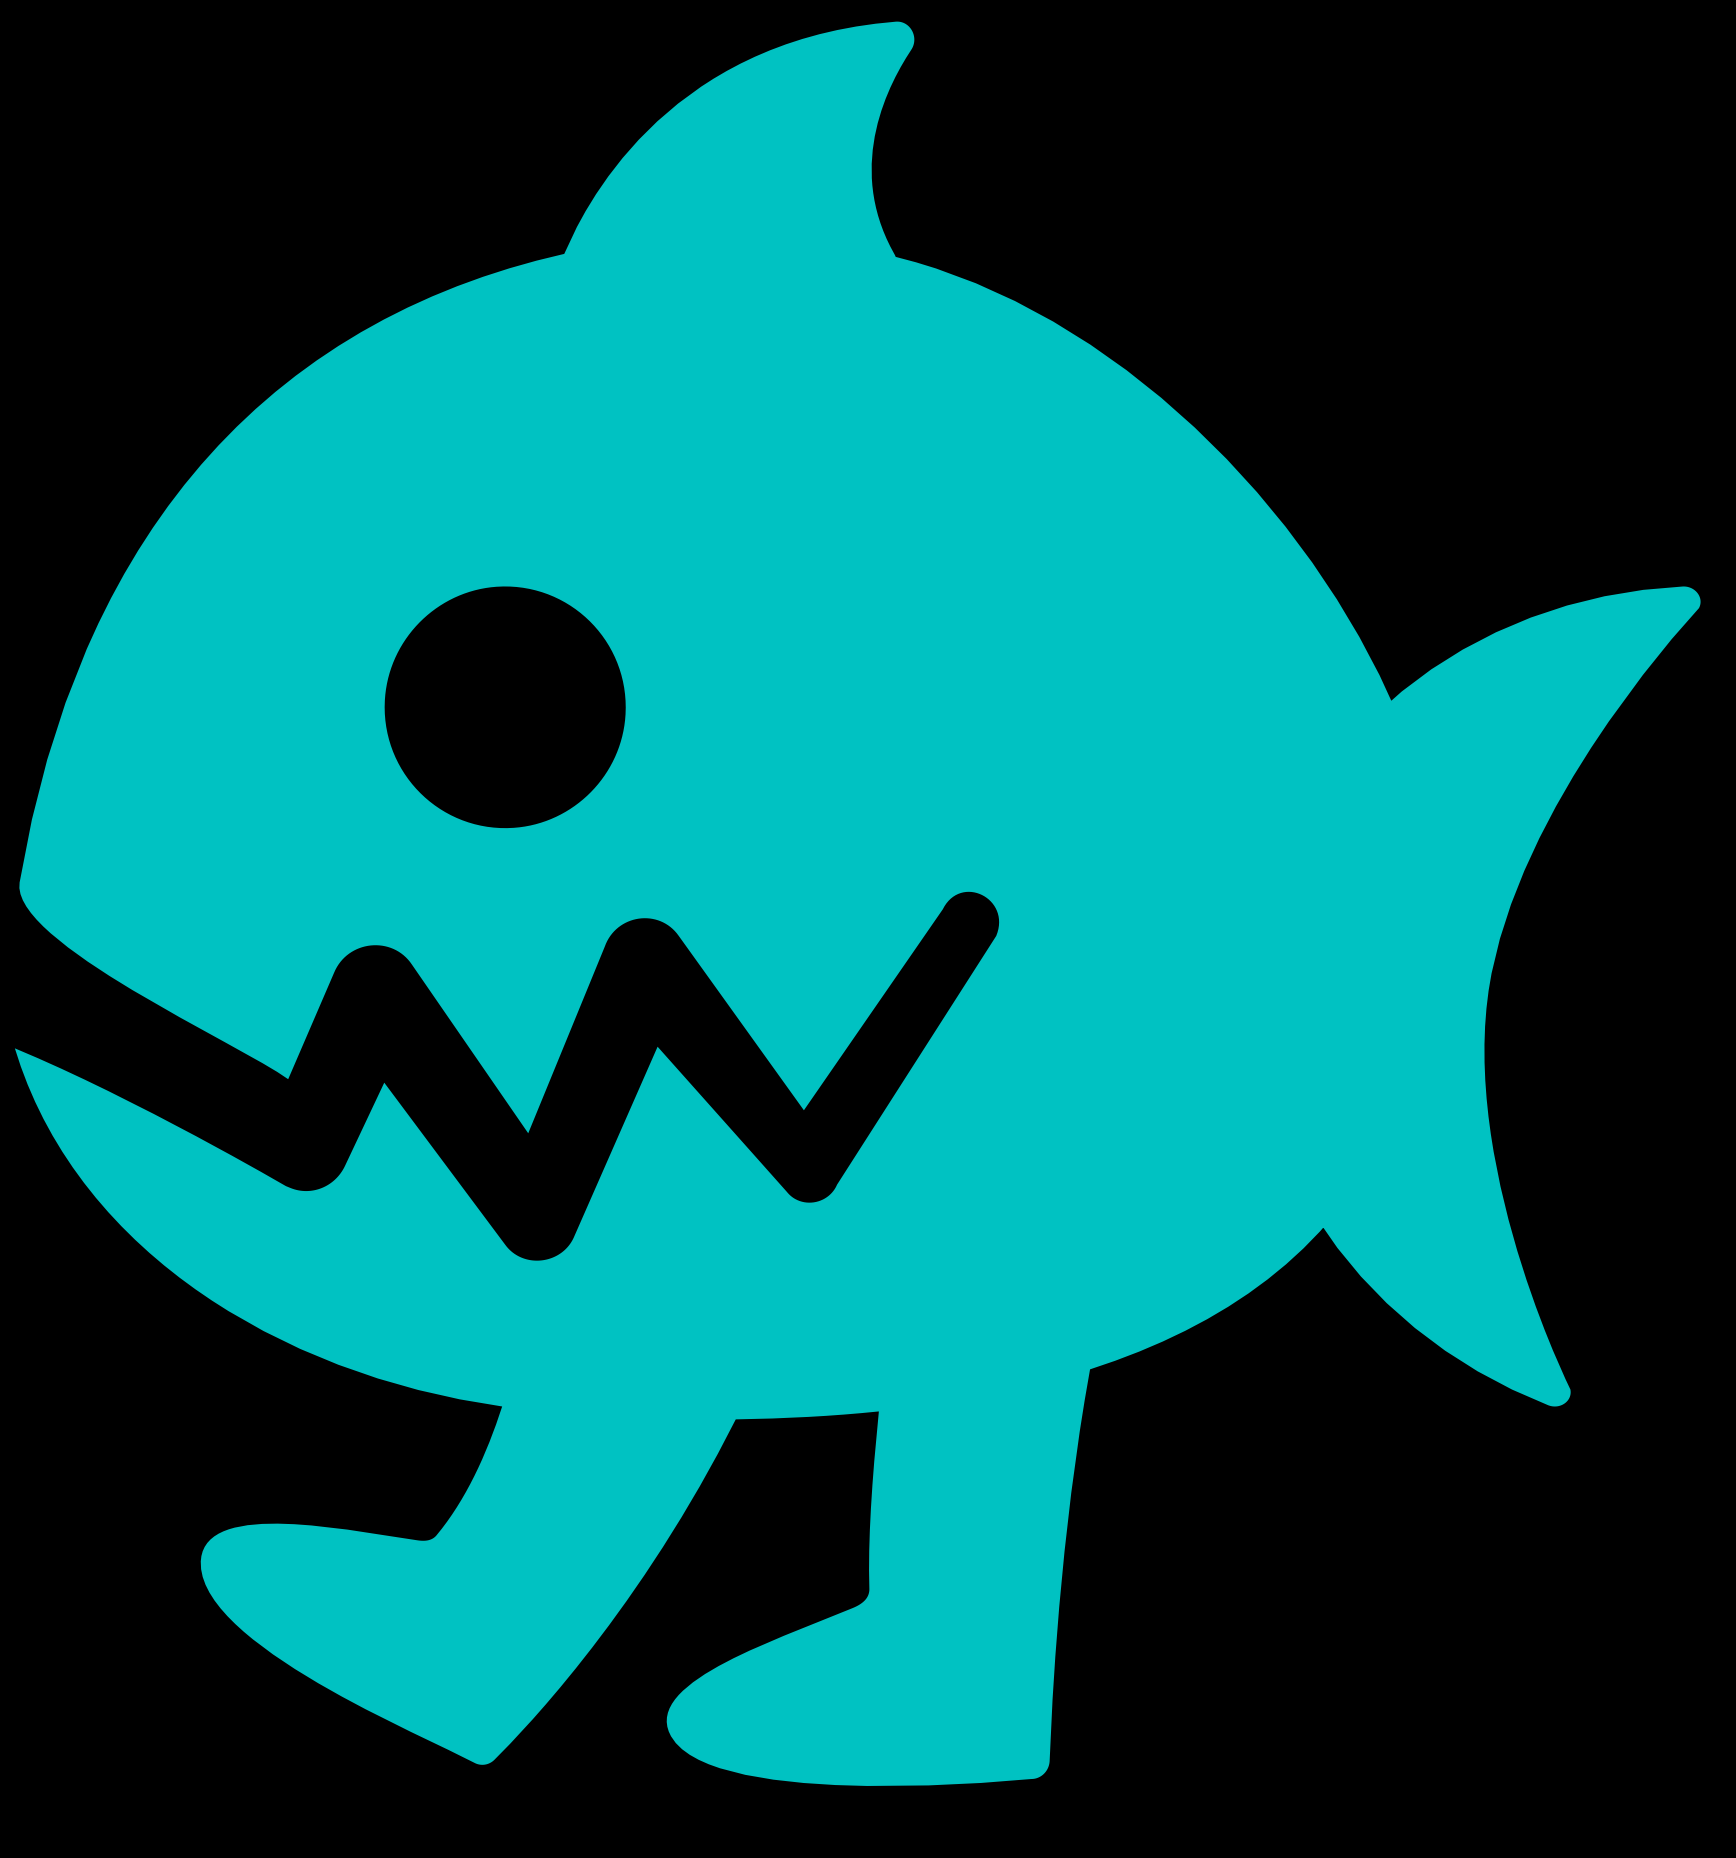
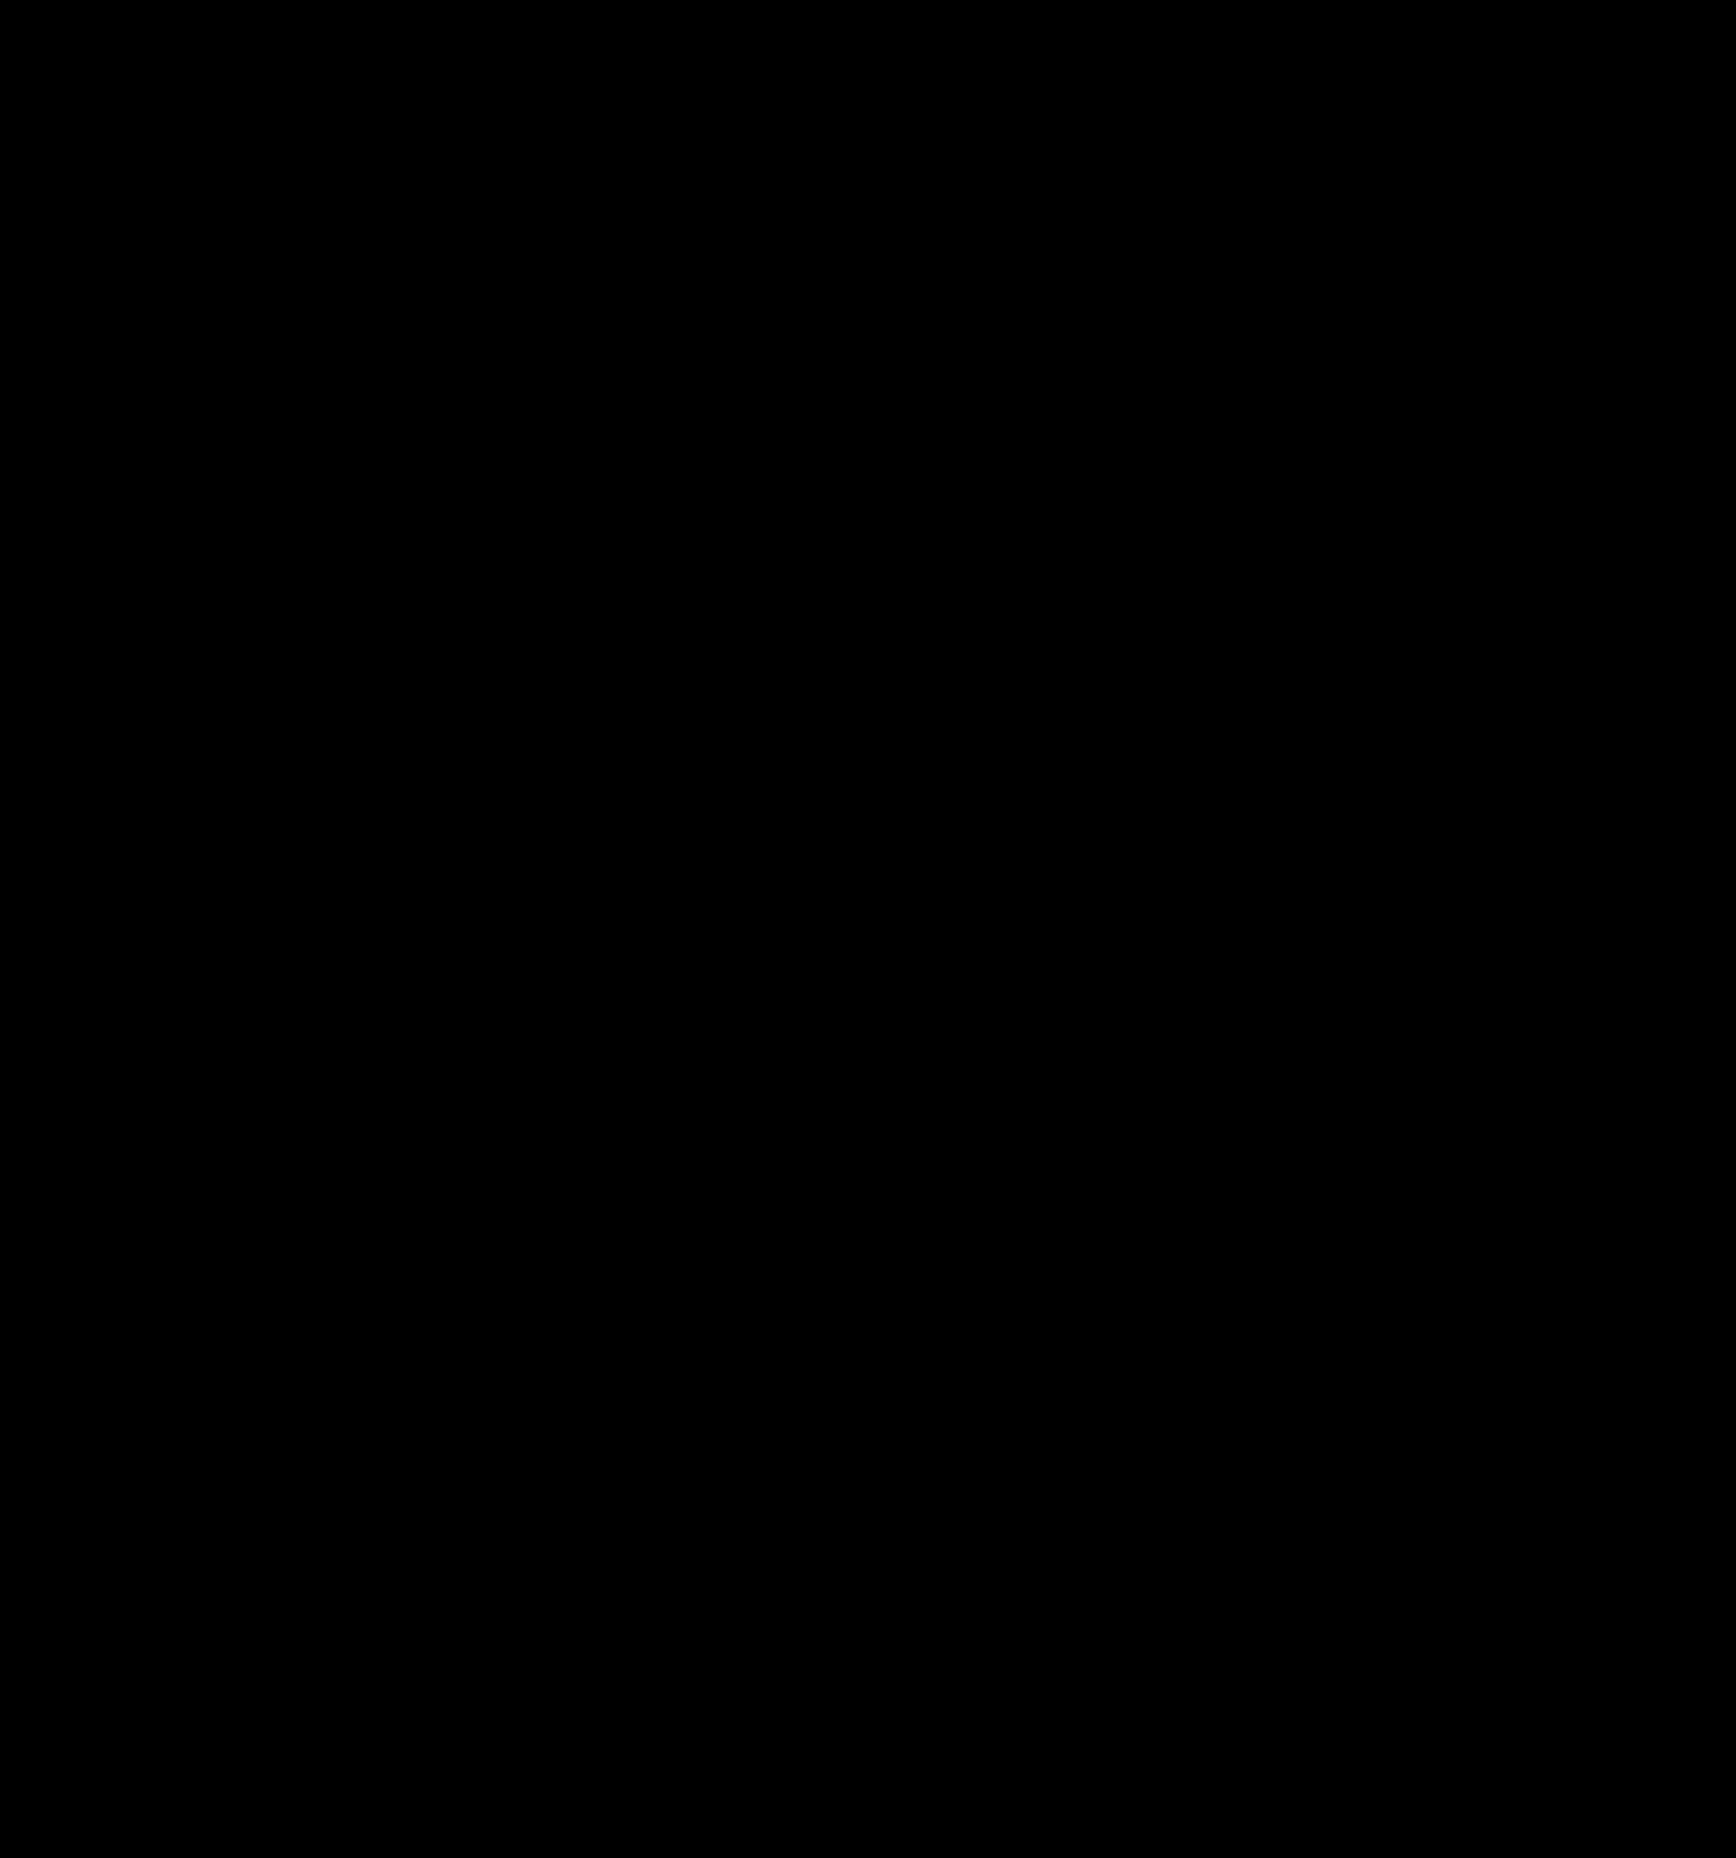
drawing: [14, 21, 1701, 1786] -> none

